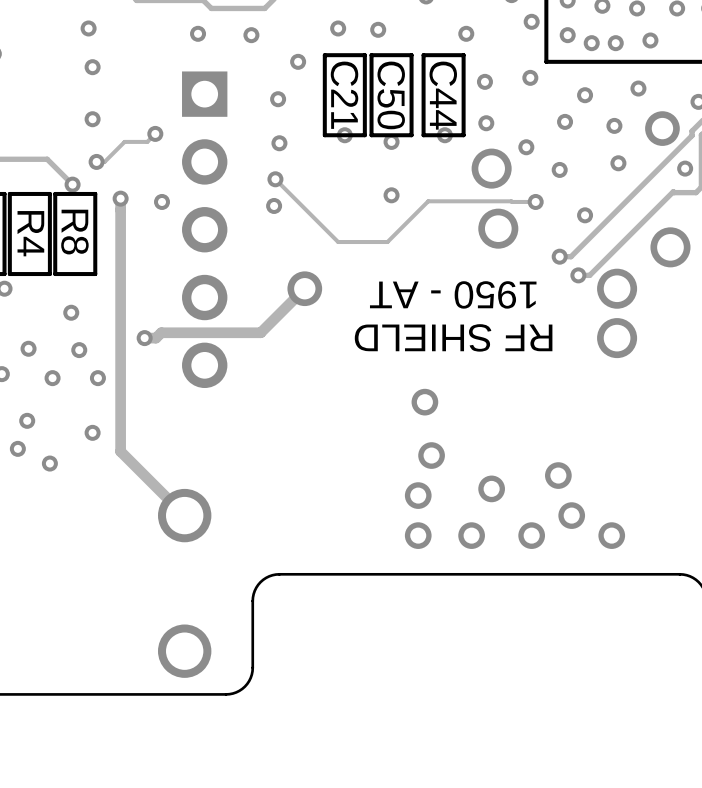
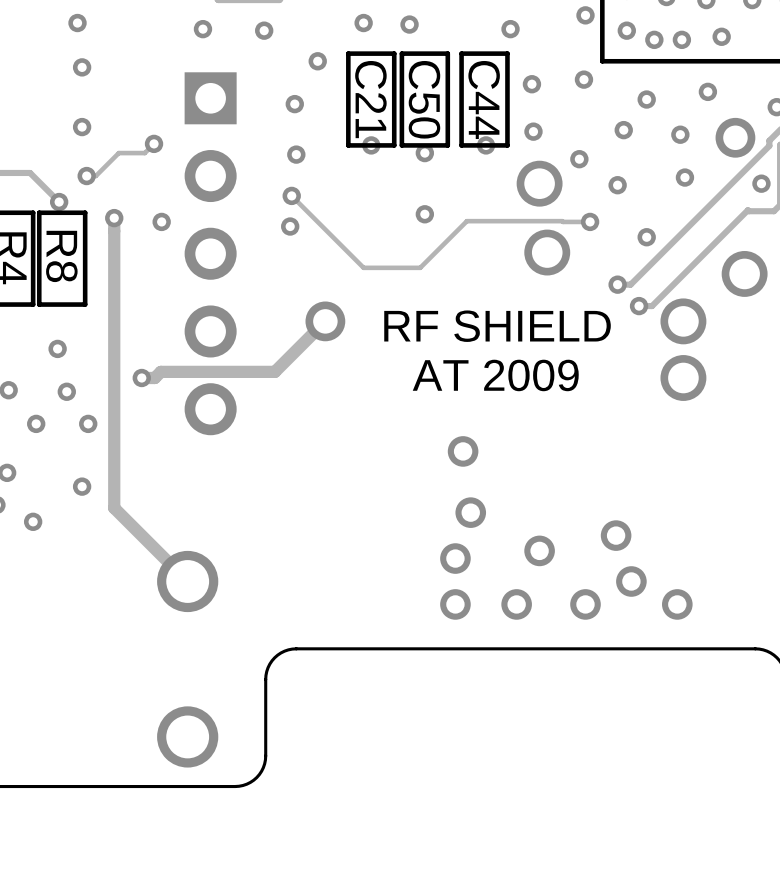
text: 1950 - AT (453, 294) -> RF SHIELD (497, 326)
text: RF SHIELD (453, 337) -> AT 2009 (495, 375)

